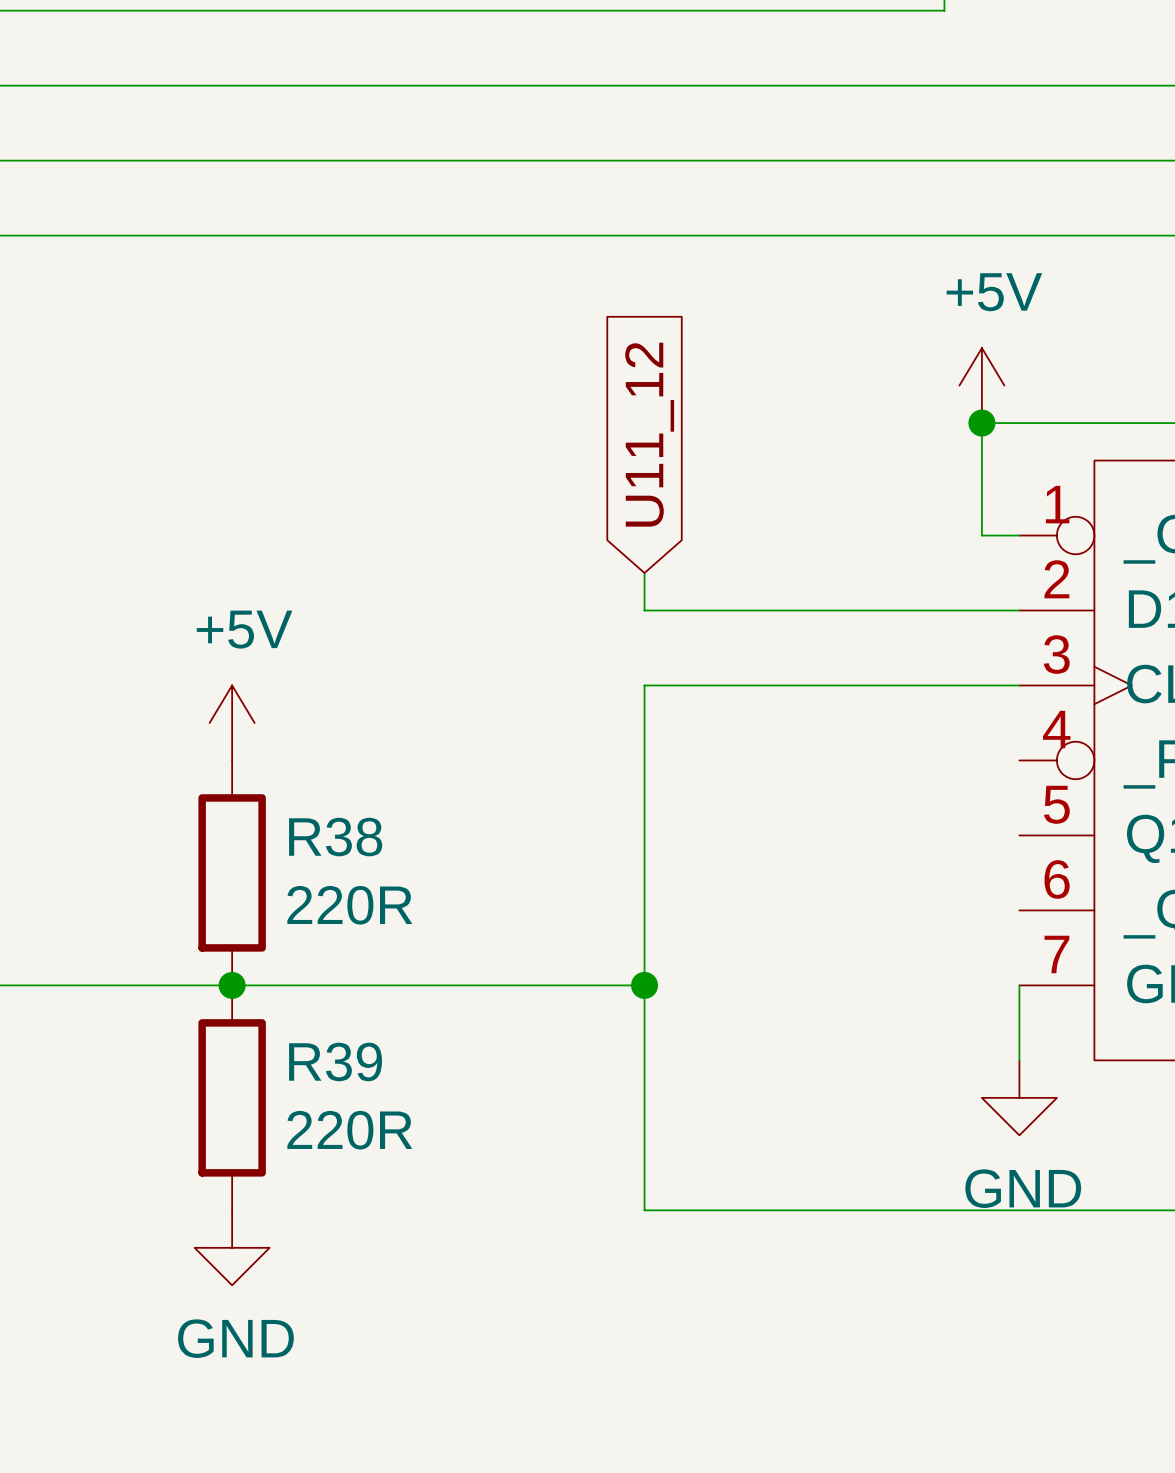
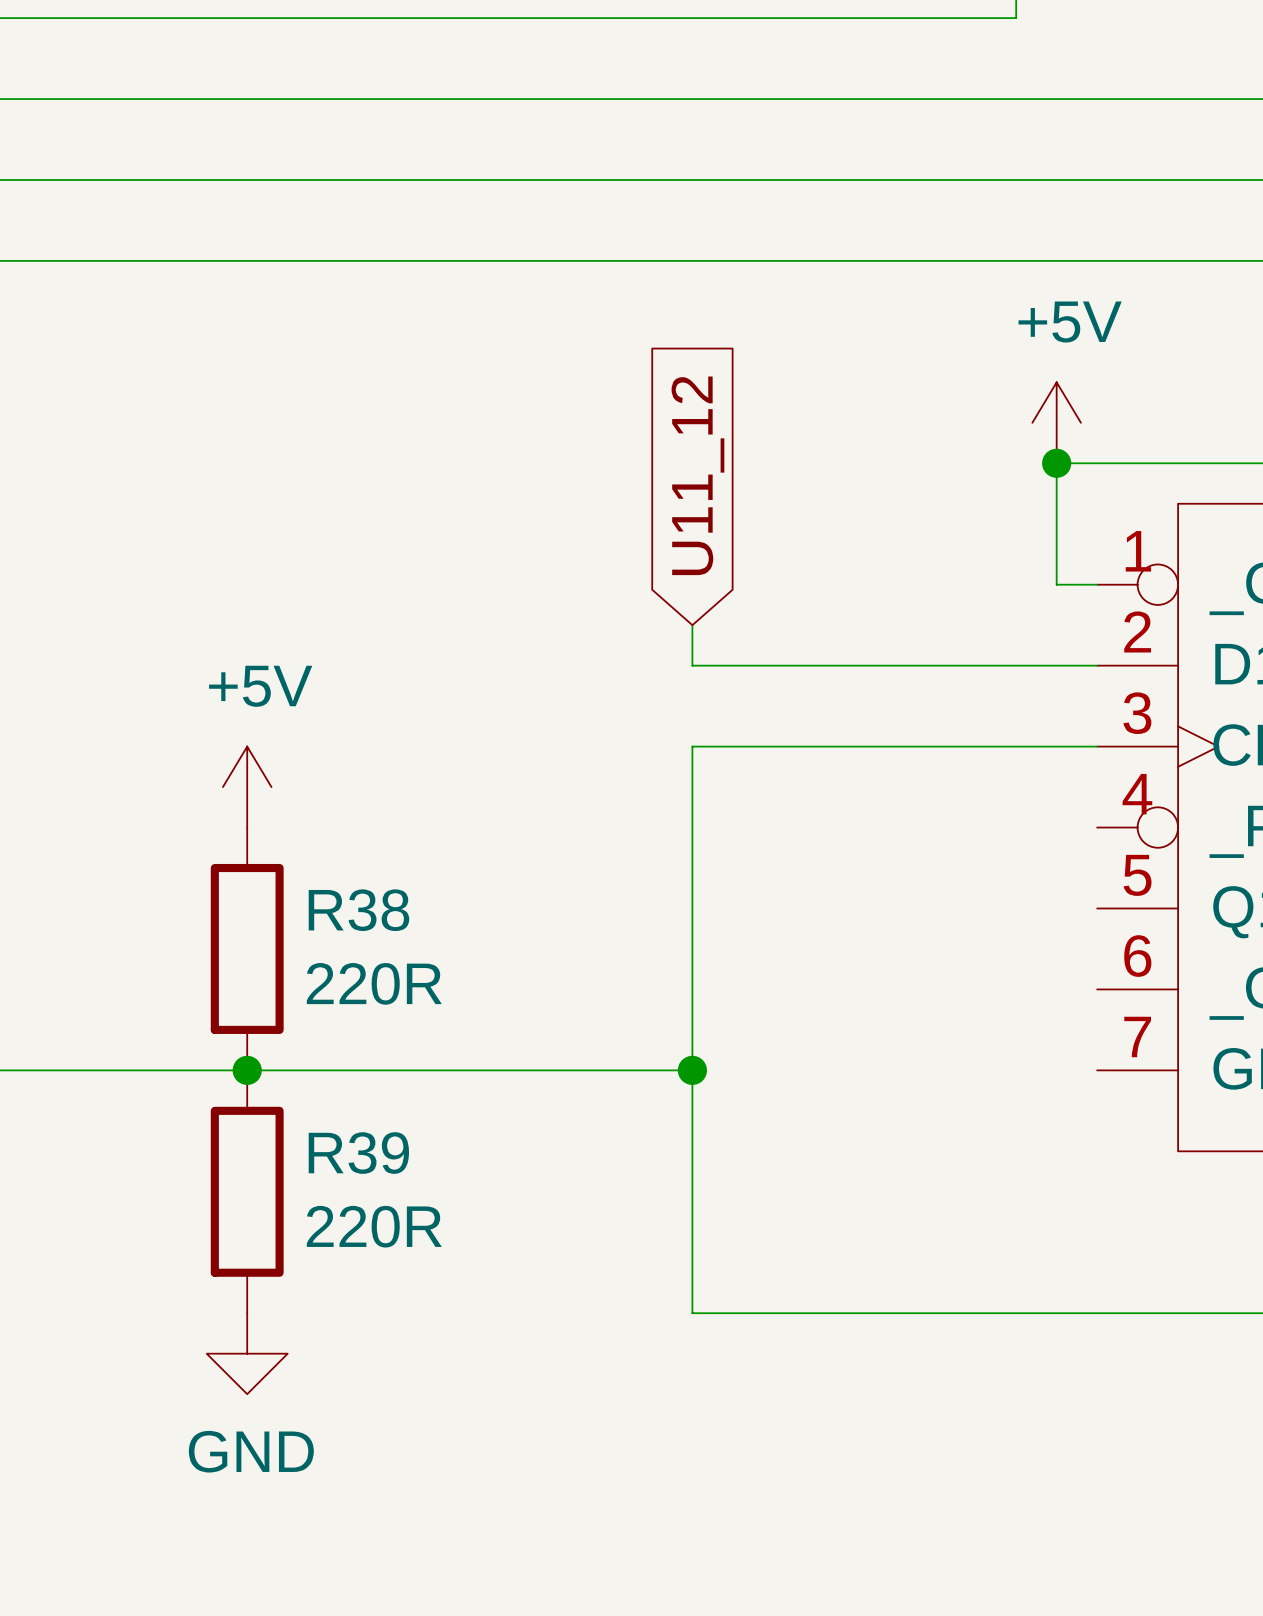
wire: (1019, 985) (1019, 1060) -> none
power symbol: GND (1019, 1097) -> none

